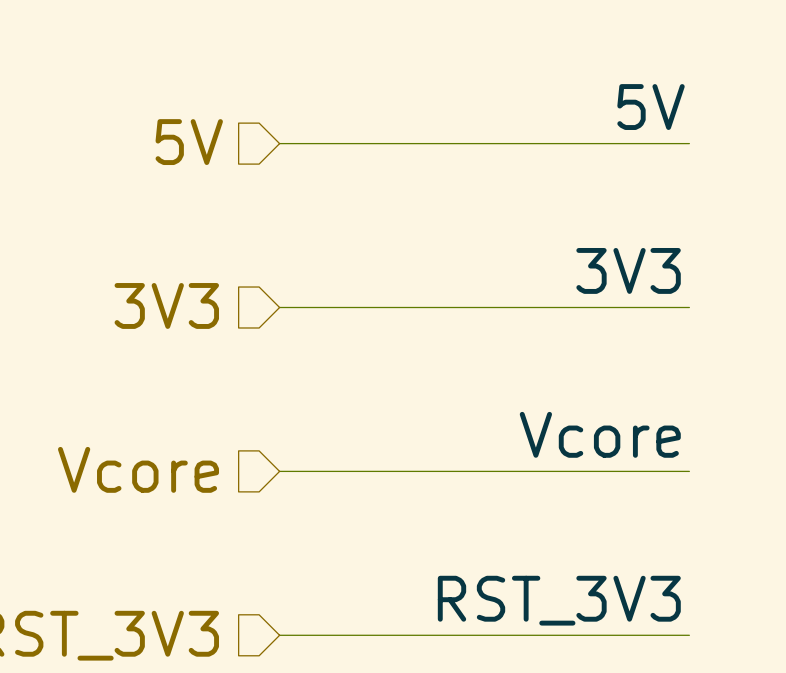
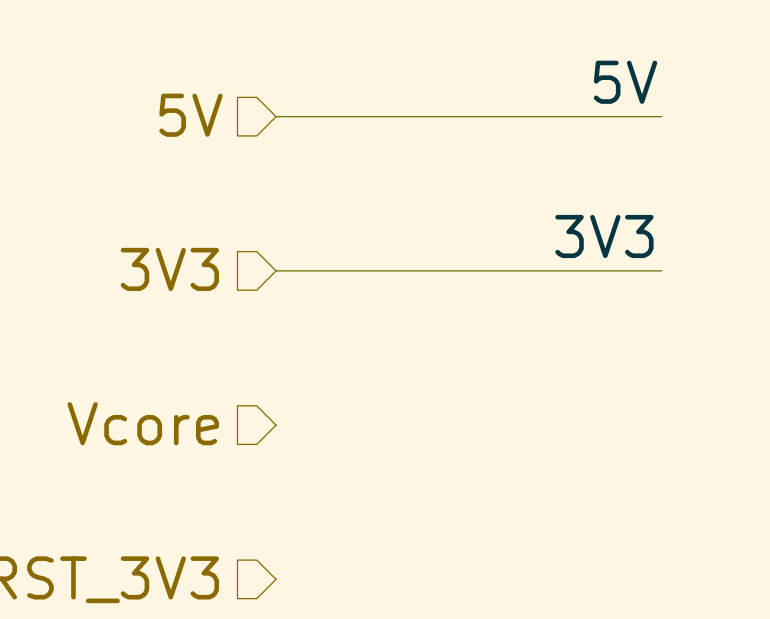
label: Vcore (600, 434) -> none
wire: (279, 471) (689, 471) -> none
label: RST_3V3 (559, 600) -> none
wire: (279, 635) (689, 635) -> none

